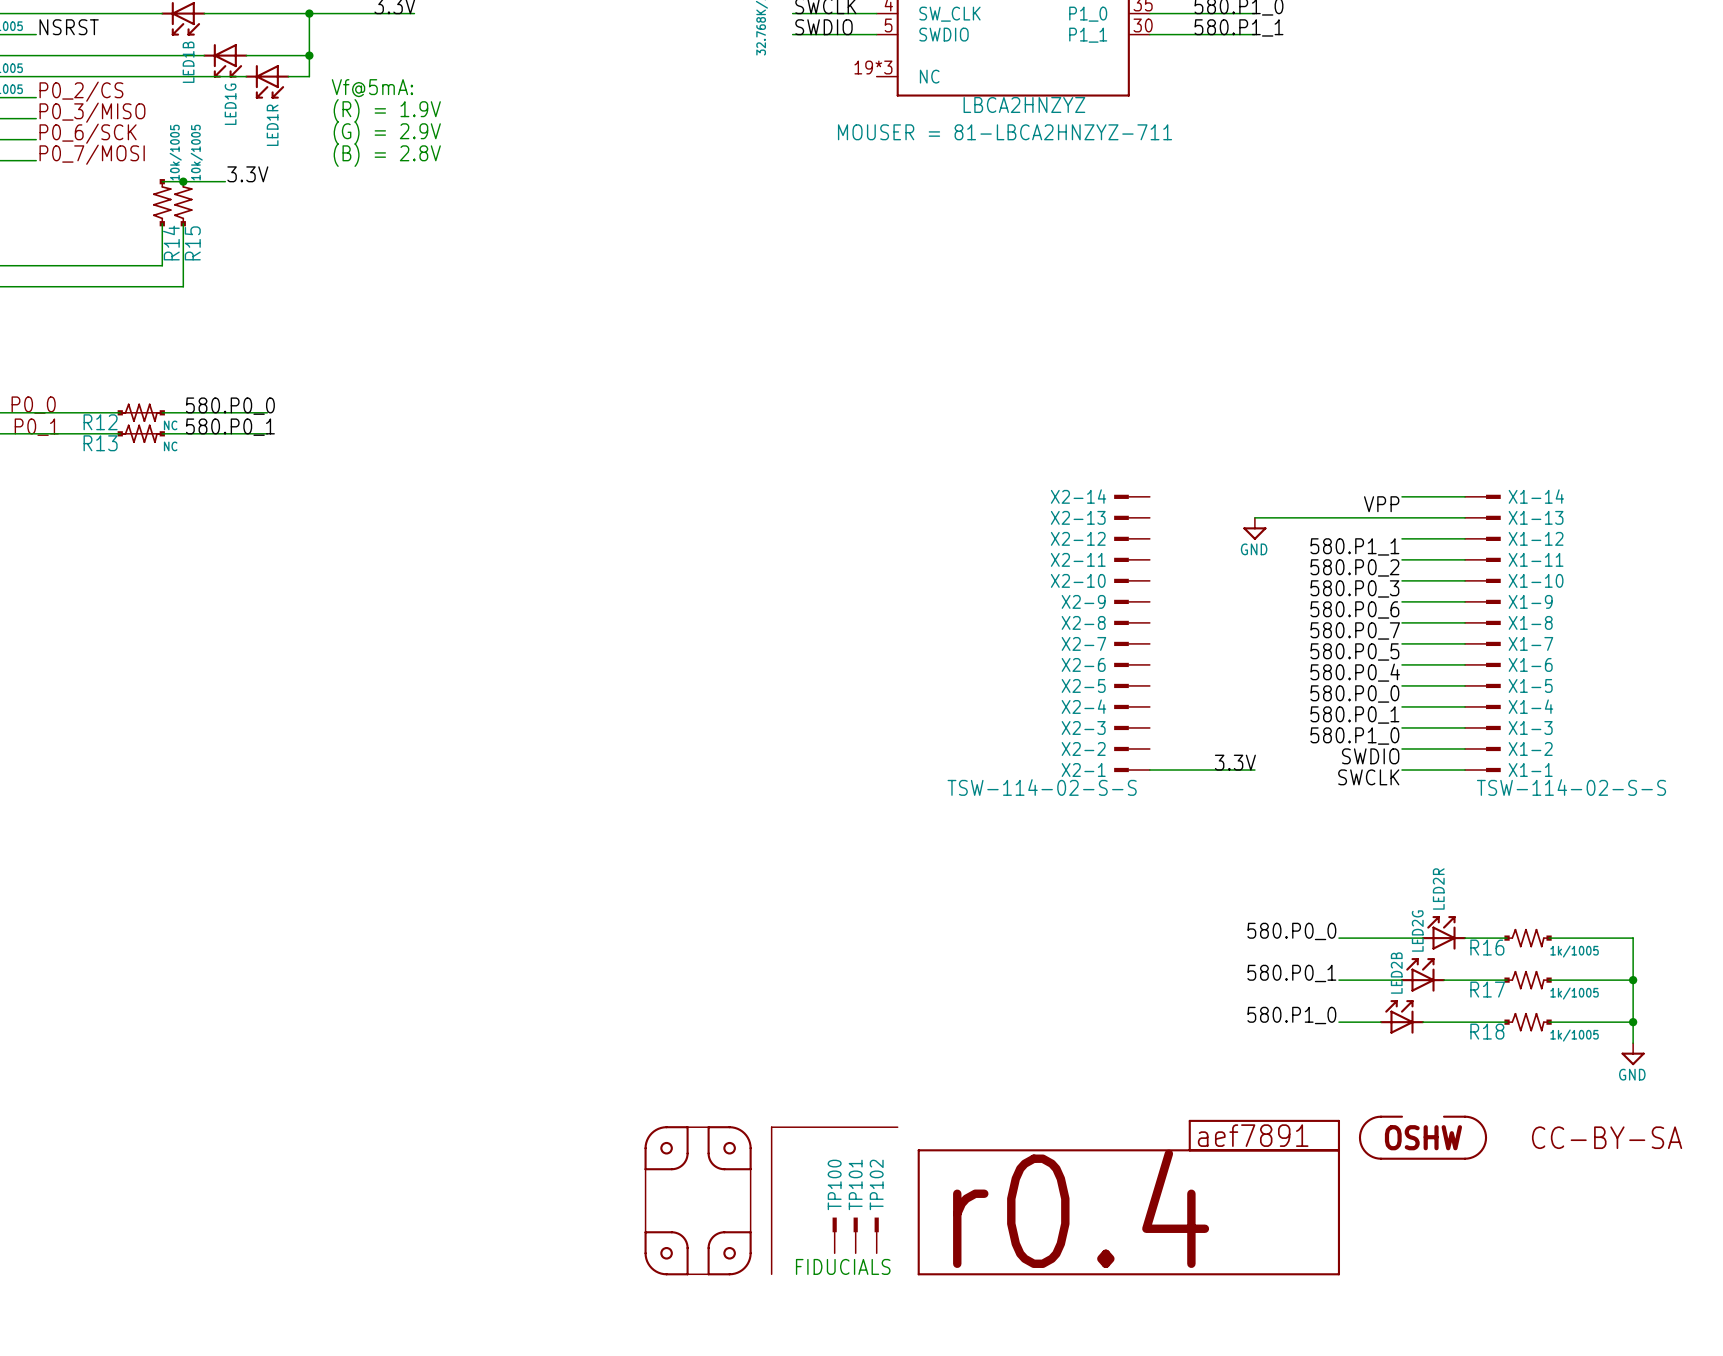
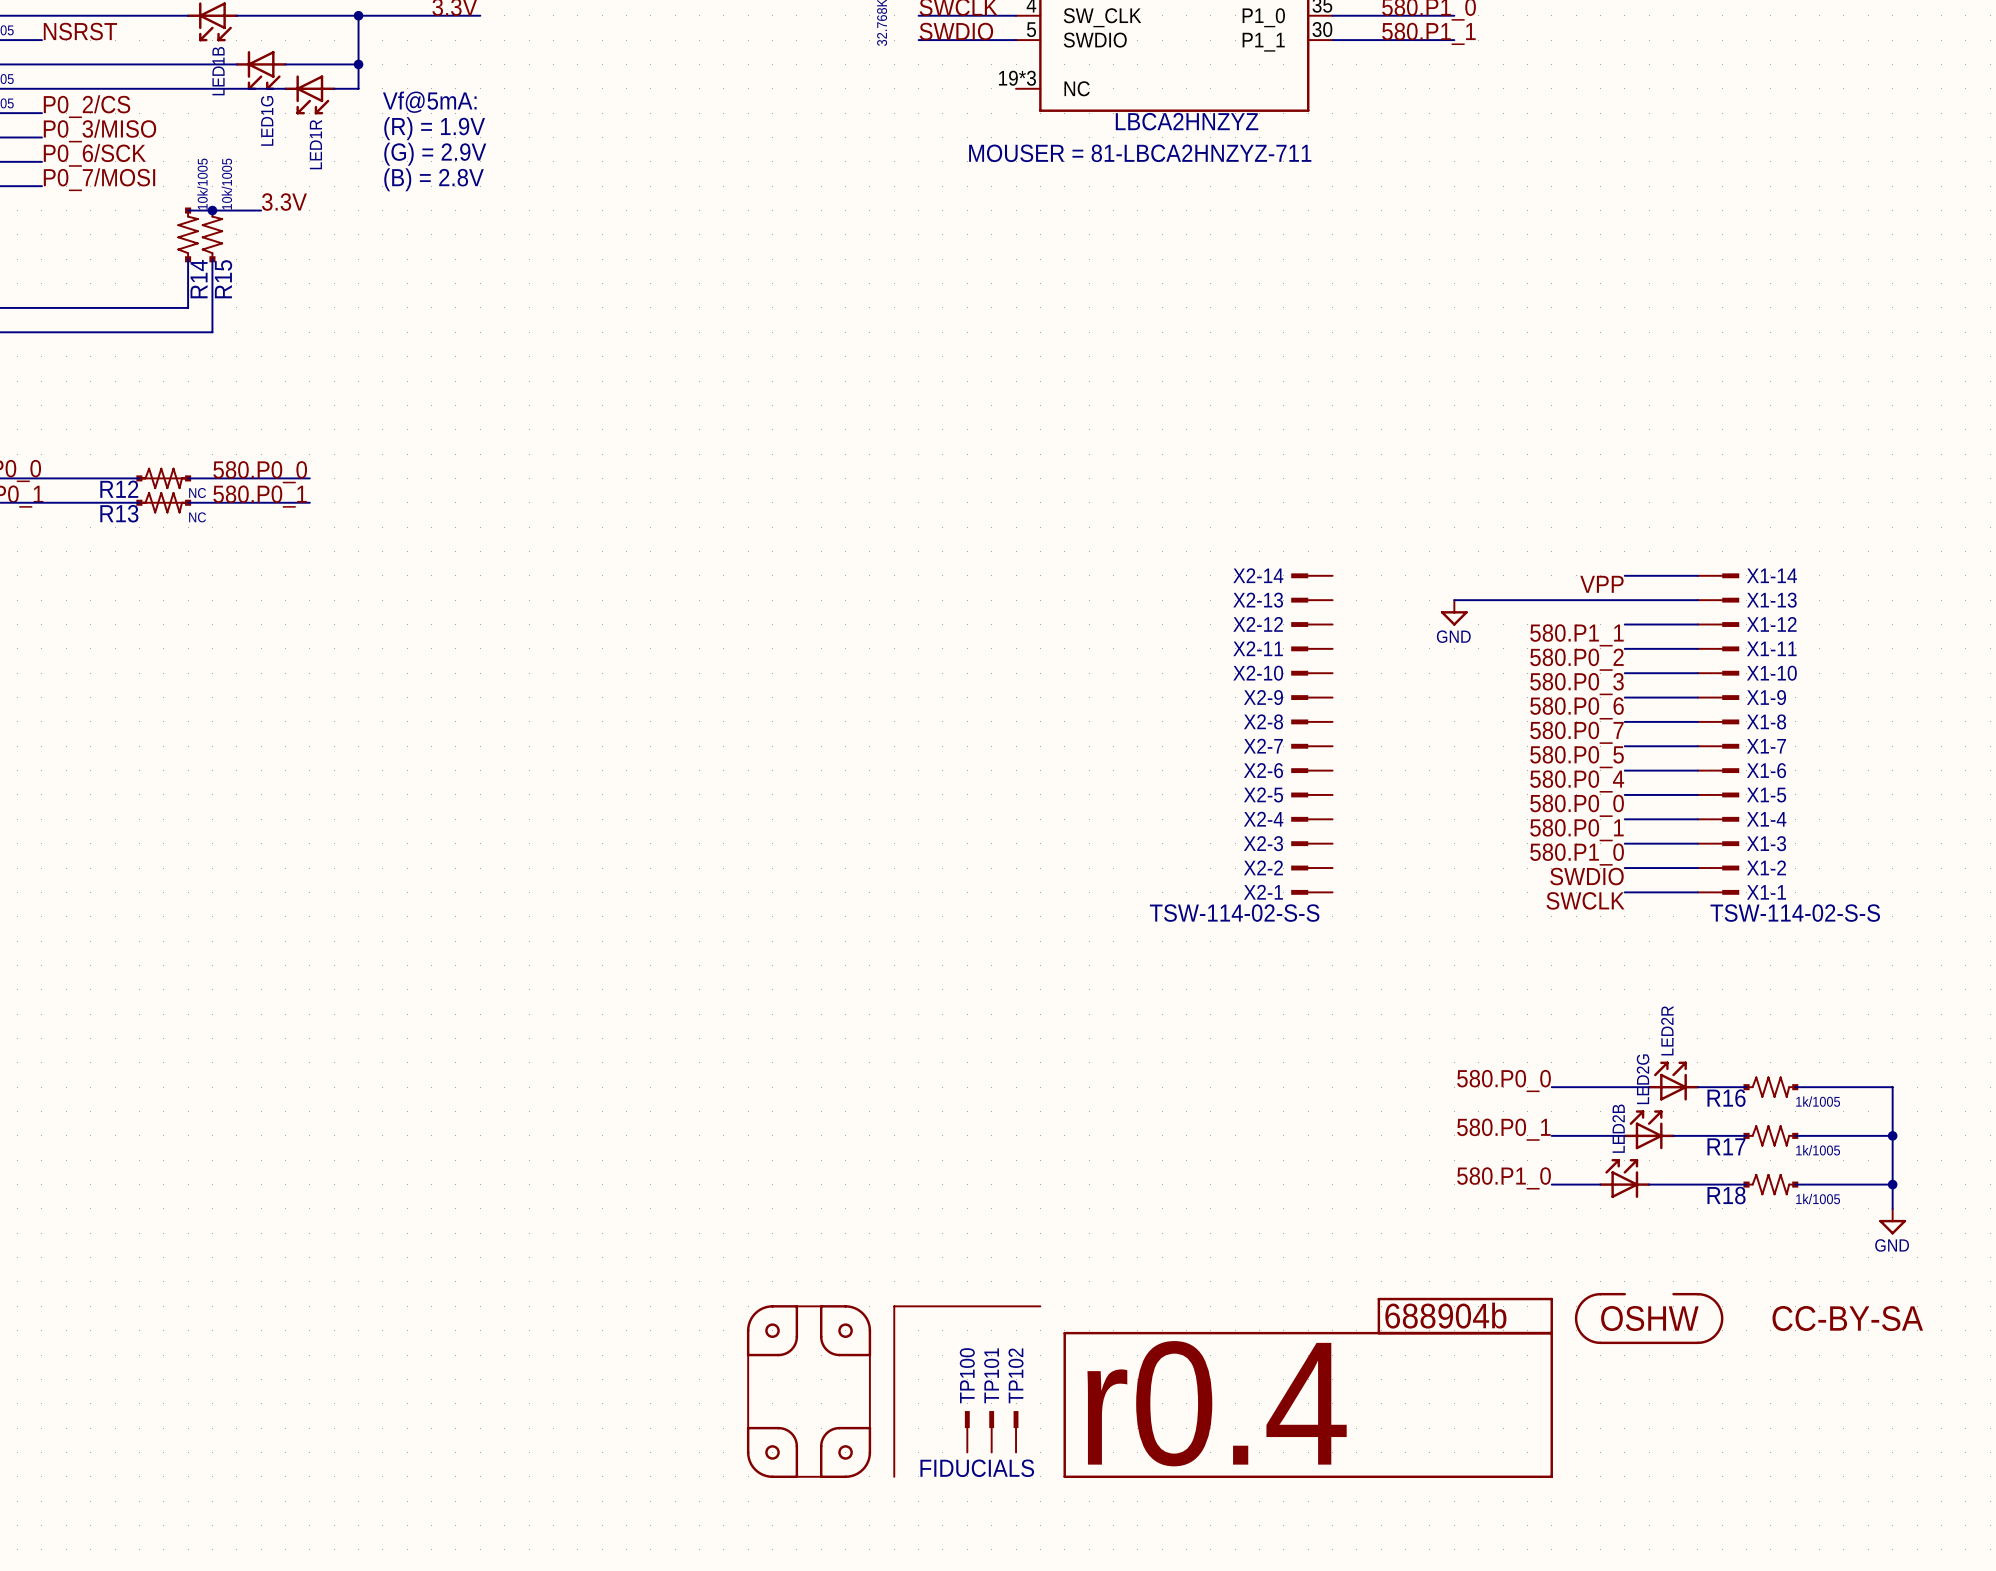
label: 3.3V (1235, 762) -> none
wire: (1149, 770) (1254, 770) -> none
part value: aef7891 (1253, 1135) -> 688904b (1445, 1315)

